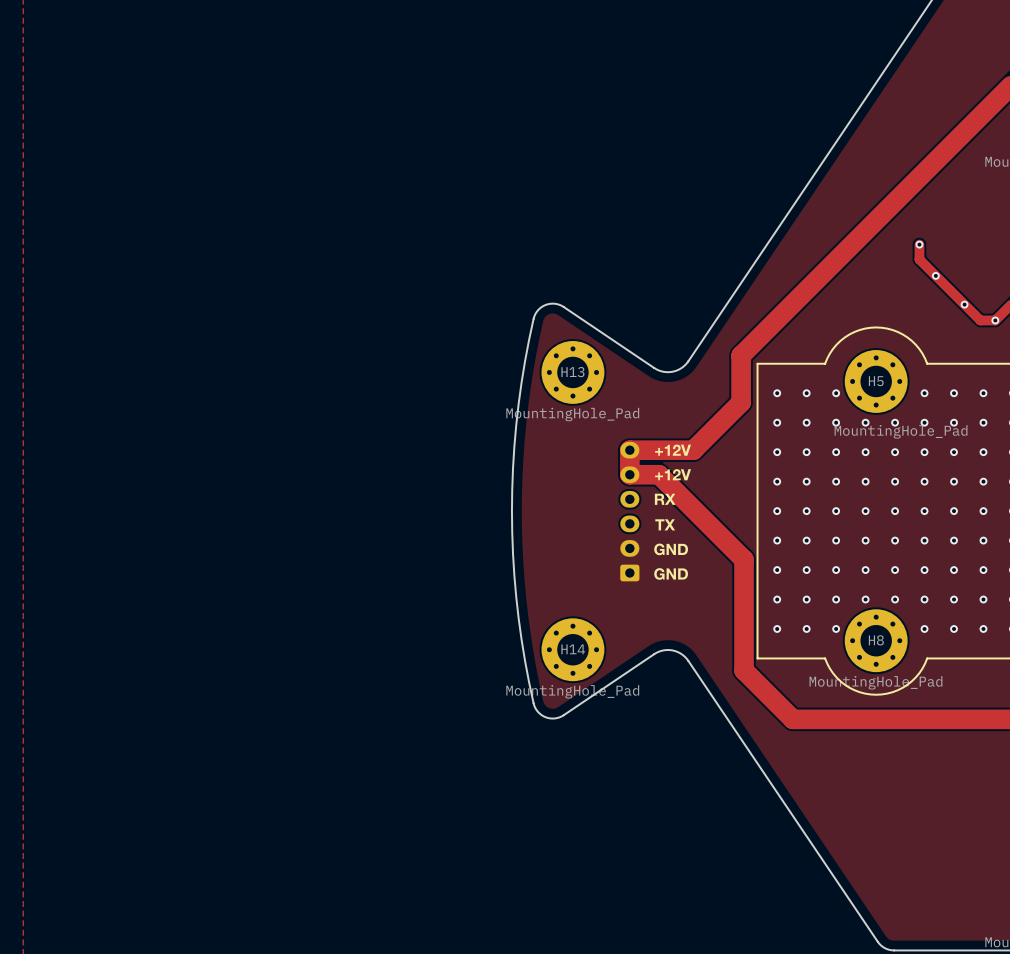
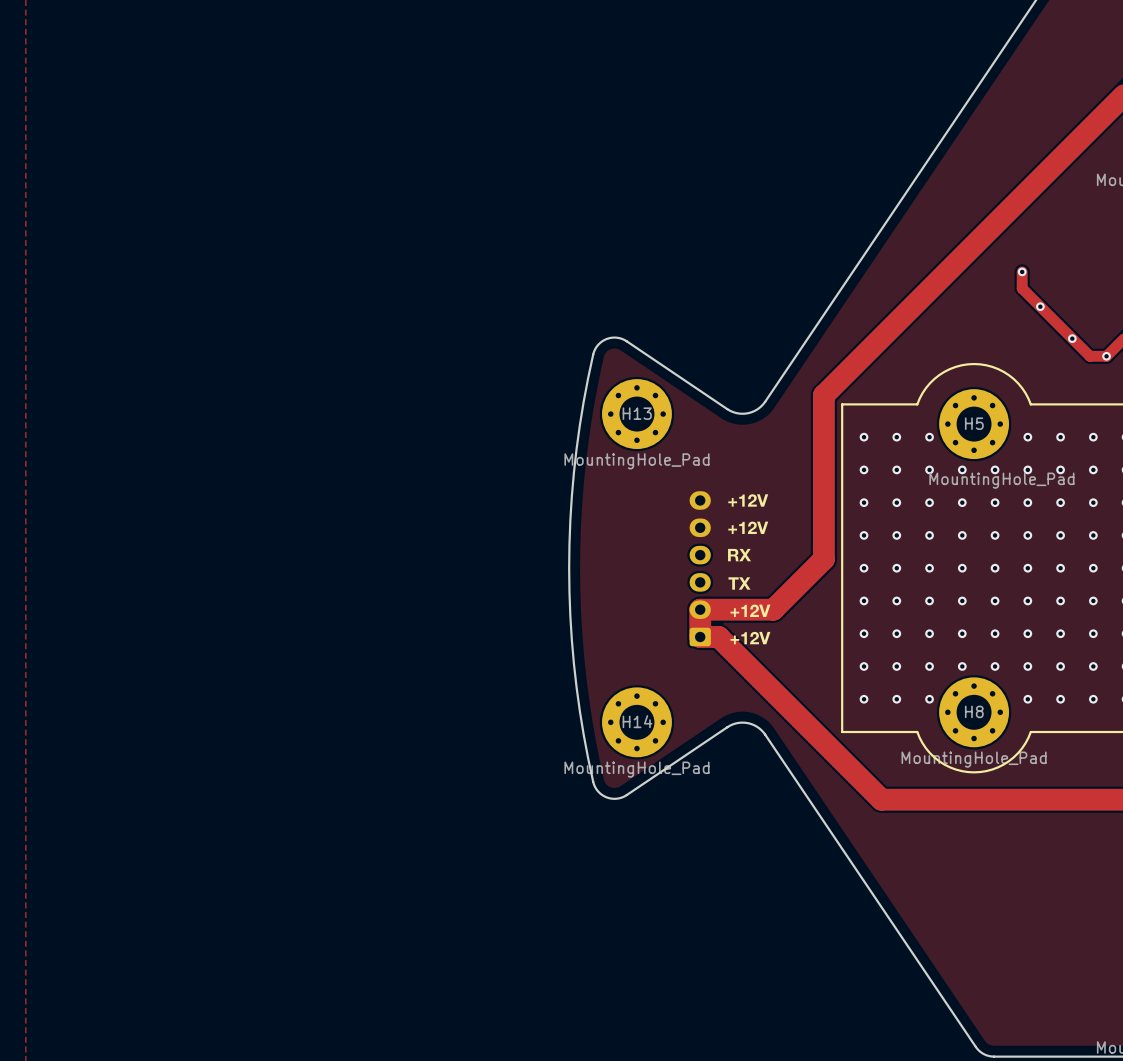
track: (741, 402) (693, 450) (629, 450) (629, 474) (659, 474) (744, 559) (744, 670) -> (823, 447) (823, 559) (773, 609) (700, 609) (700, 637) (718, 637) (827, 745)
drawing shape: [654, 543, 688, 556] -> [730, 604, 771, 617]
drawing shape: [654, 568, 688, 580] -> [730, 631, 771, 645]

